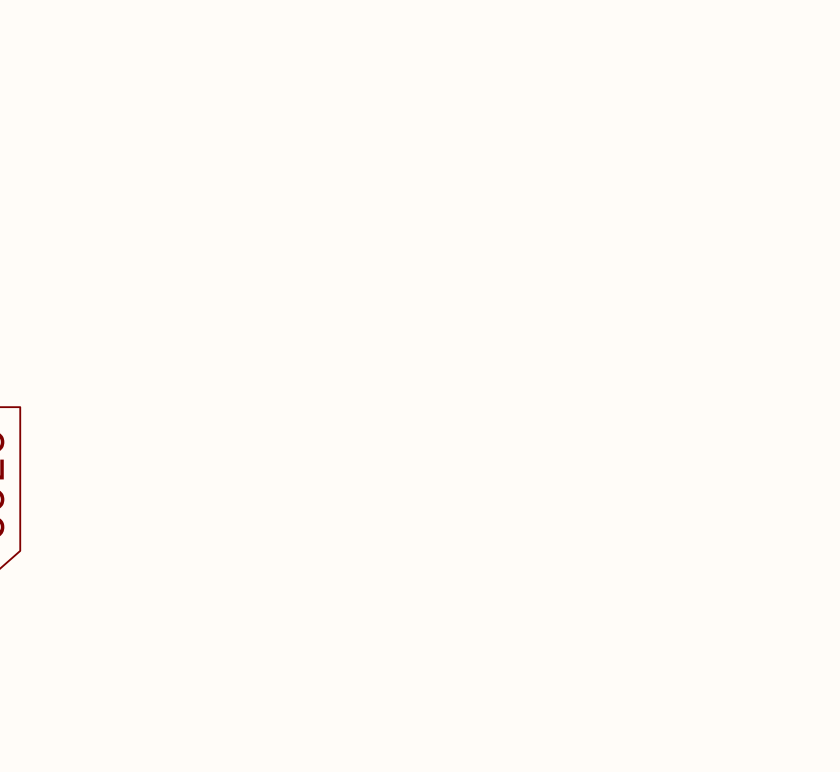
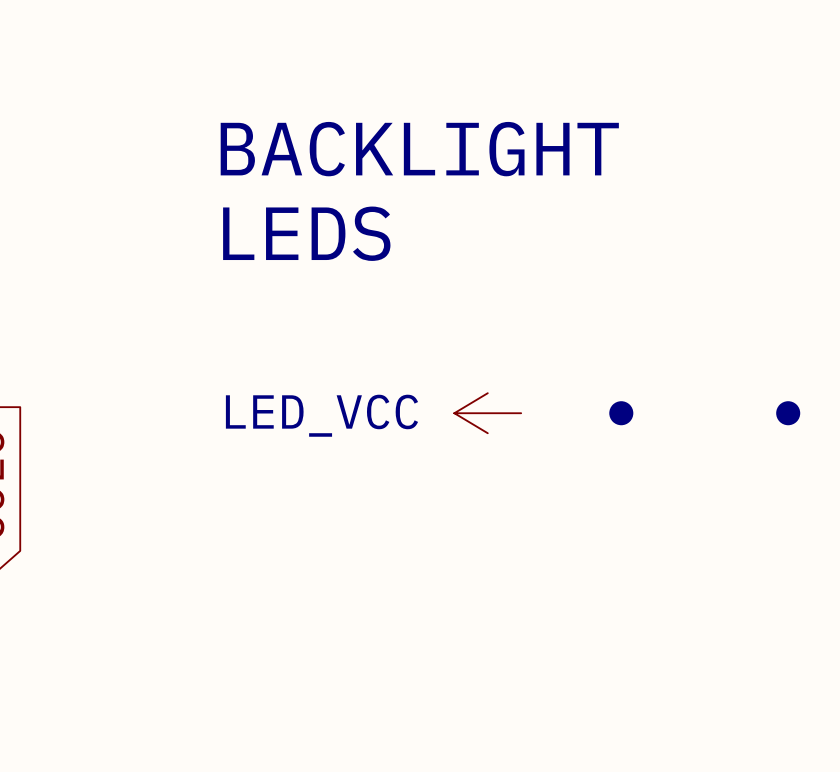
text: none -> BACKLIGHT (419, 149)
text: none -> LEDS (306, 233)
power symbol: none -> LED_VCC (487, 413)
junction: none -> (621, 413)
junction: none -> (788, 413)

